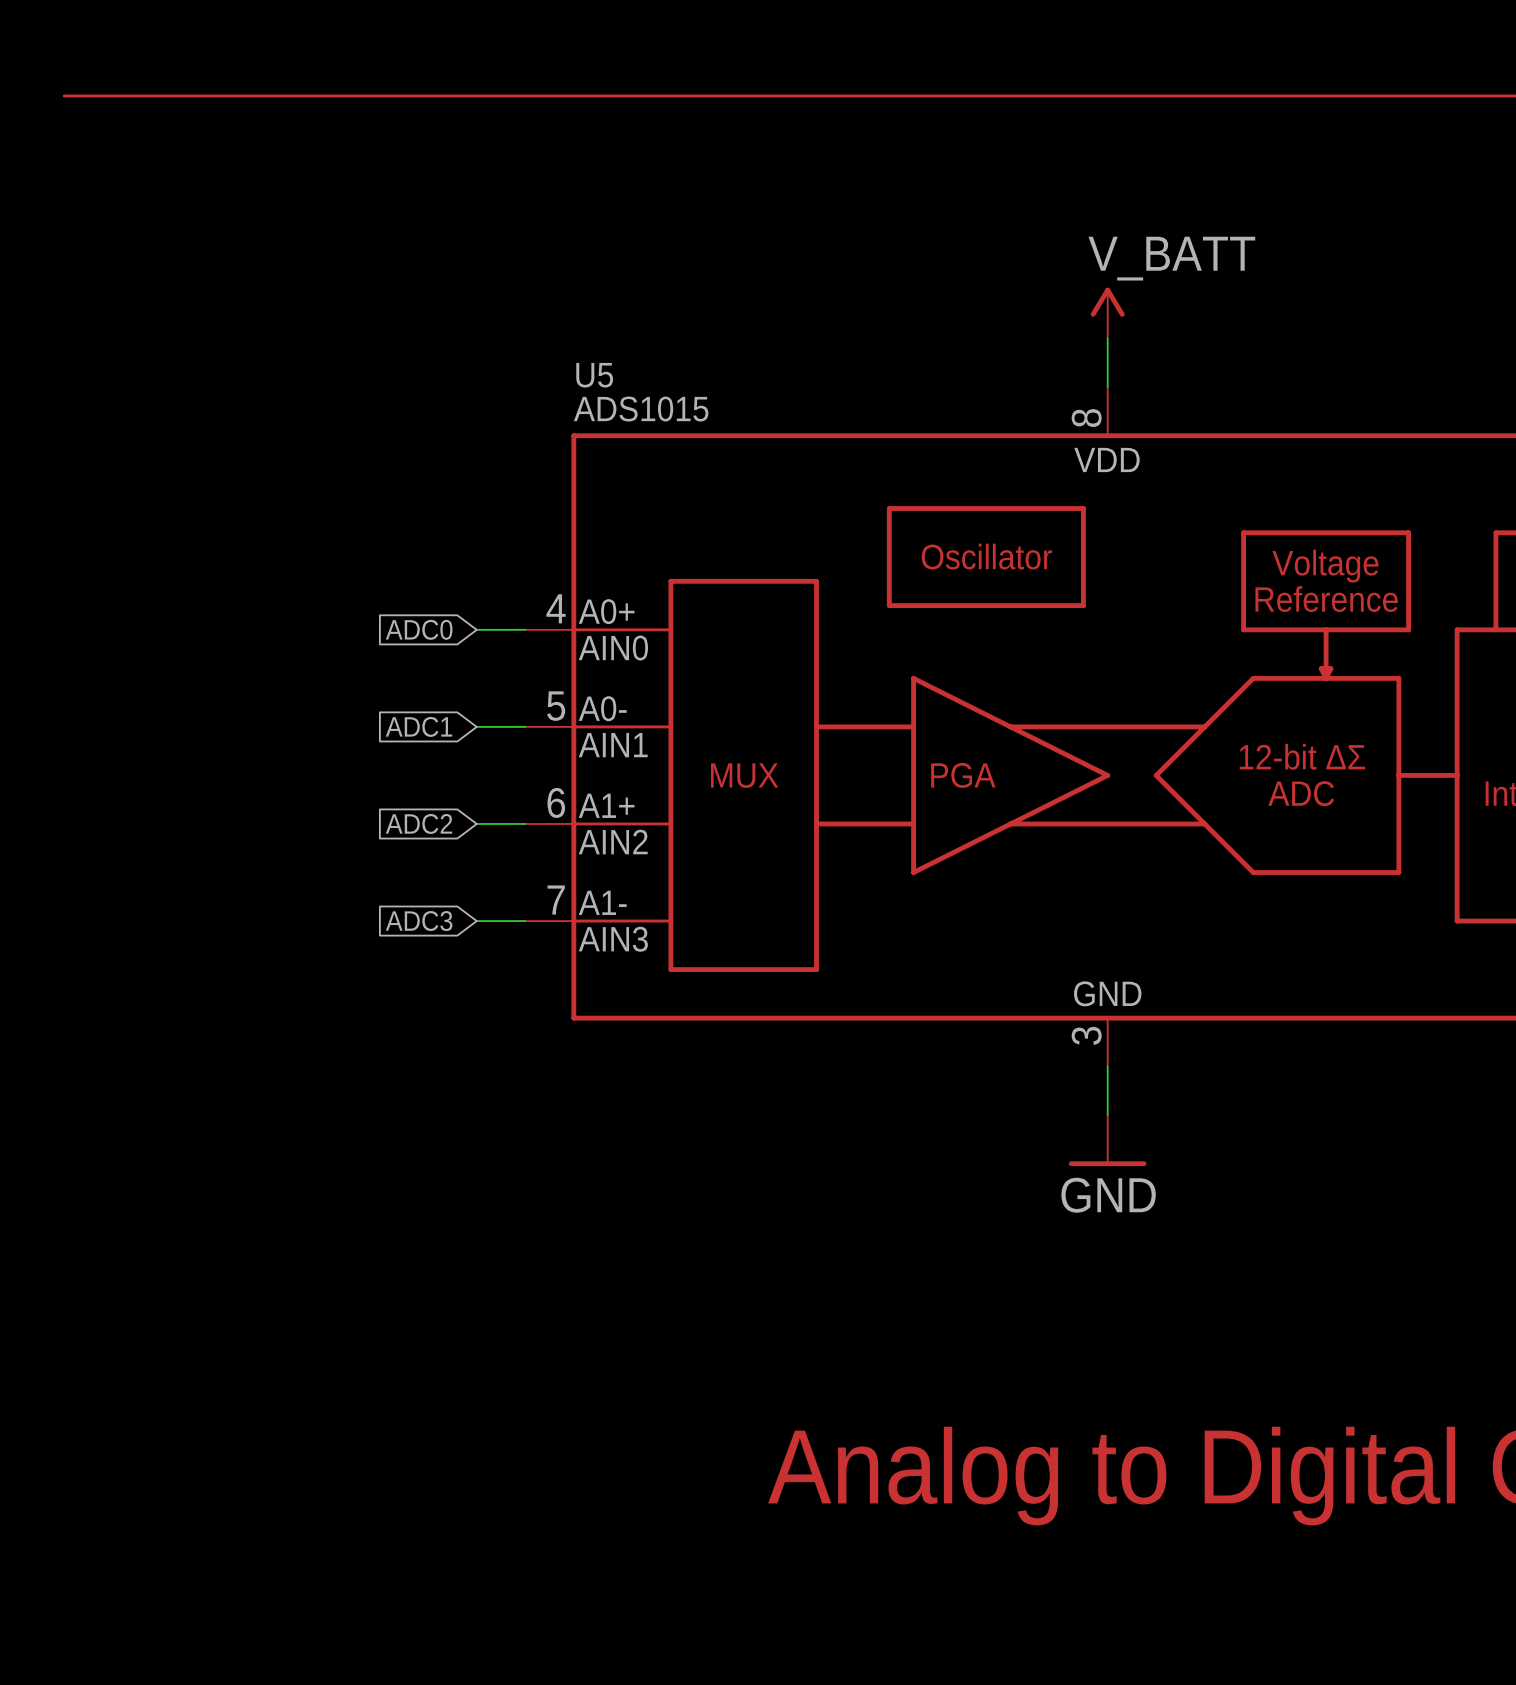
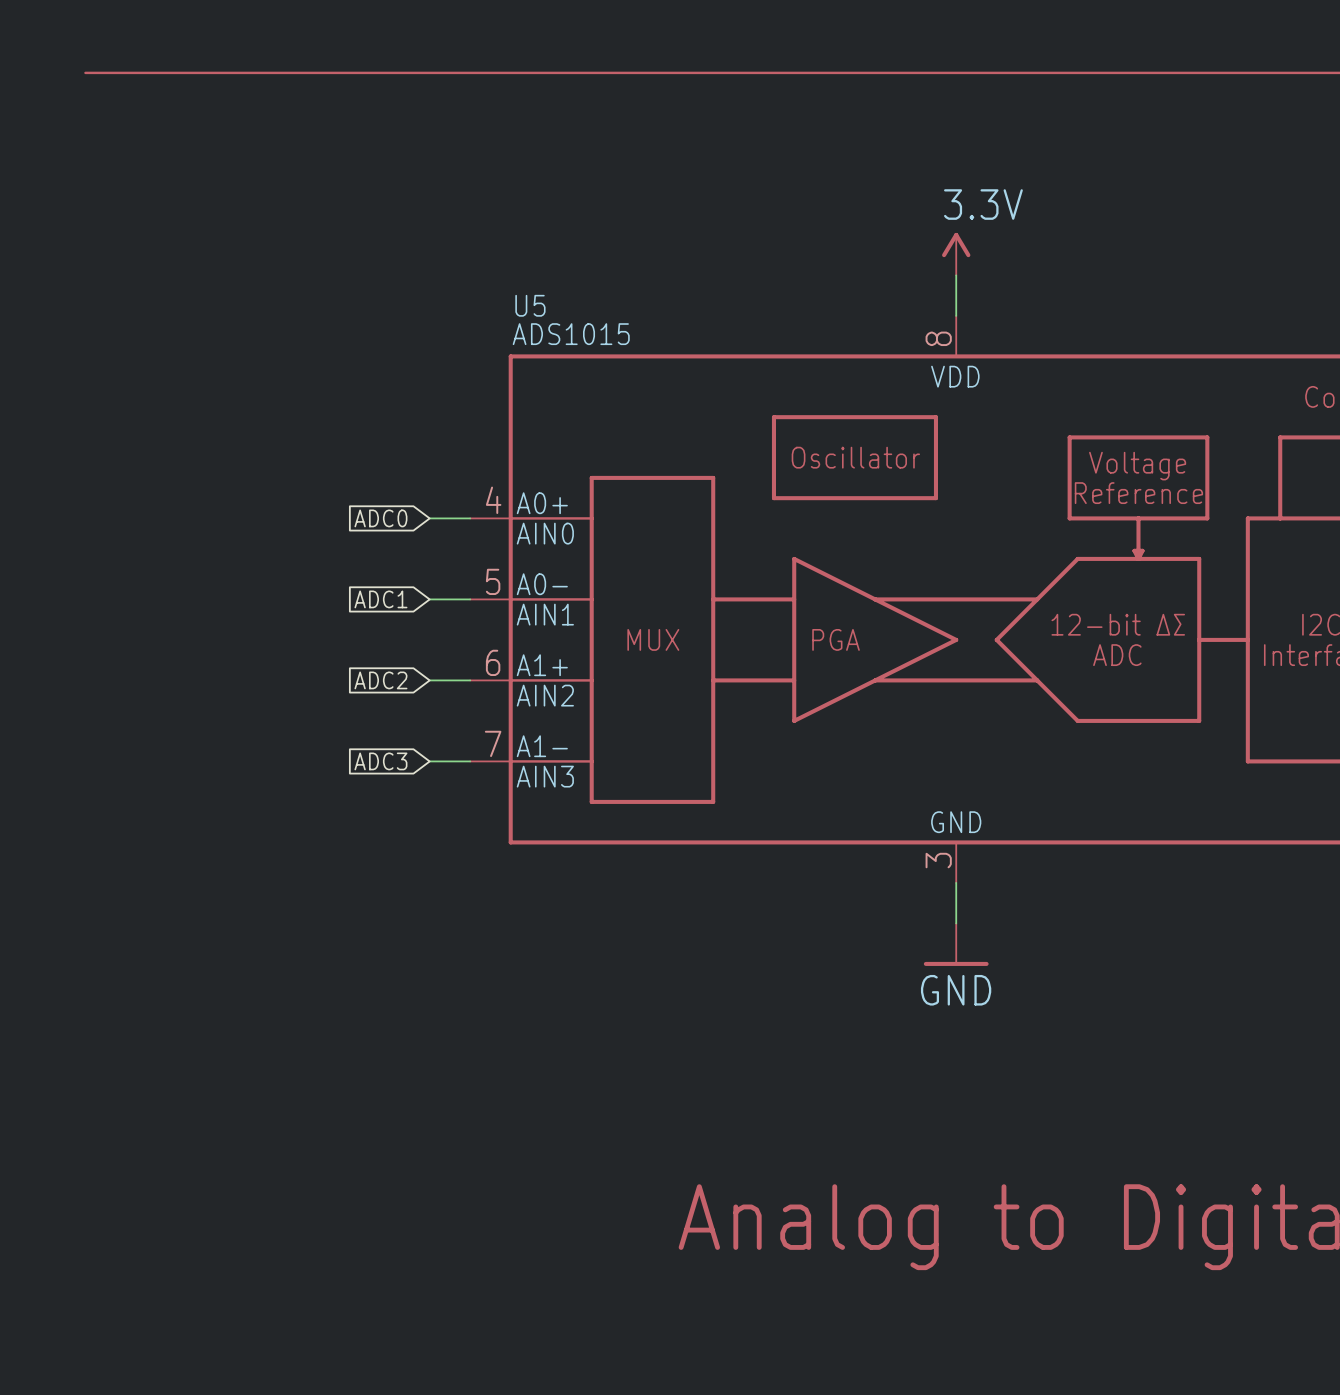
power symbol: V_BATT (1107, 313) -> 3.3V (956, 254)

